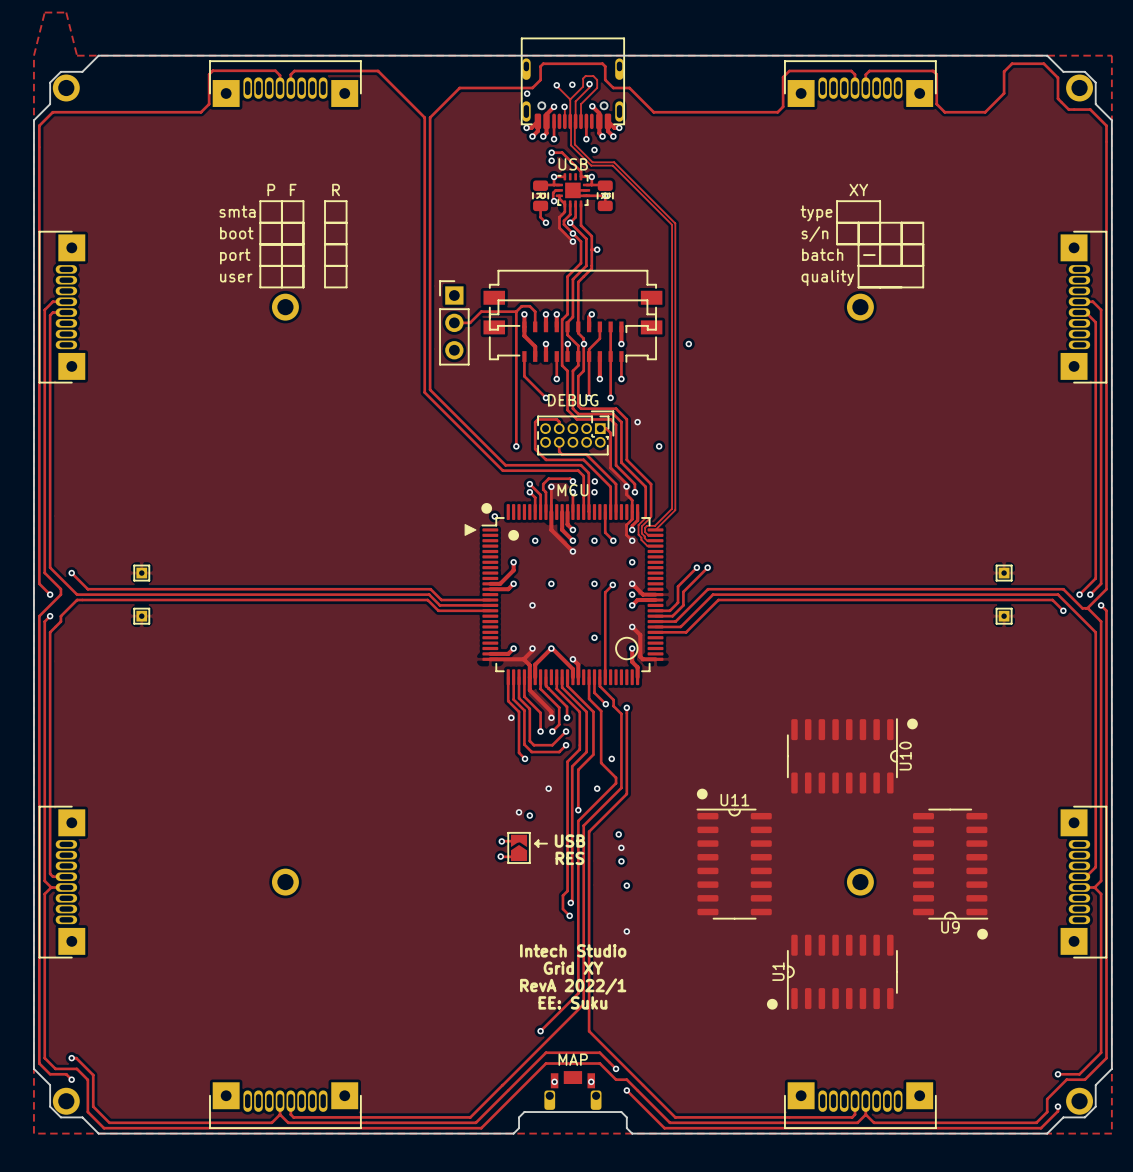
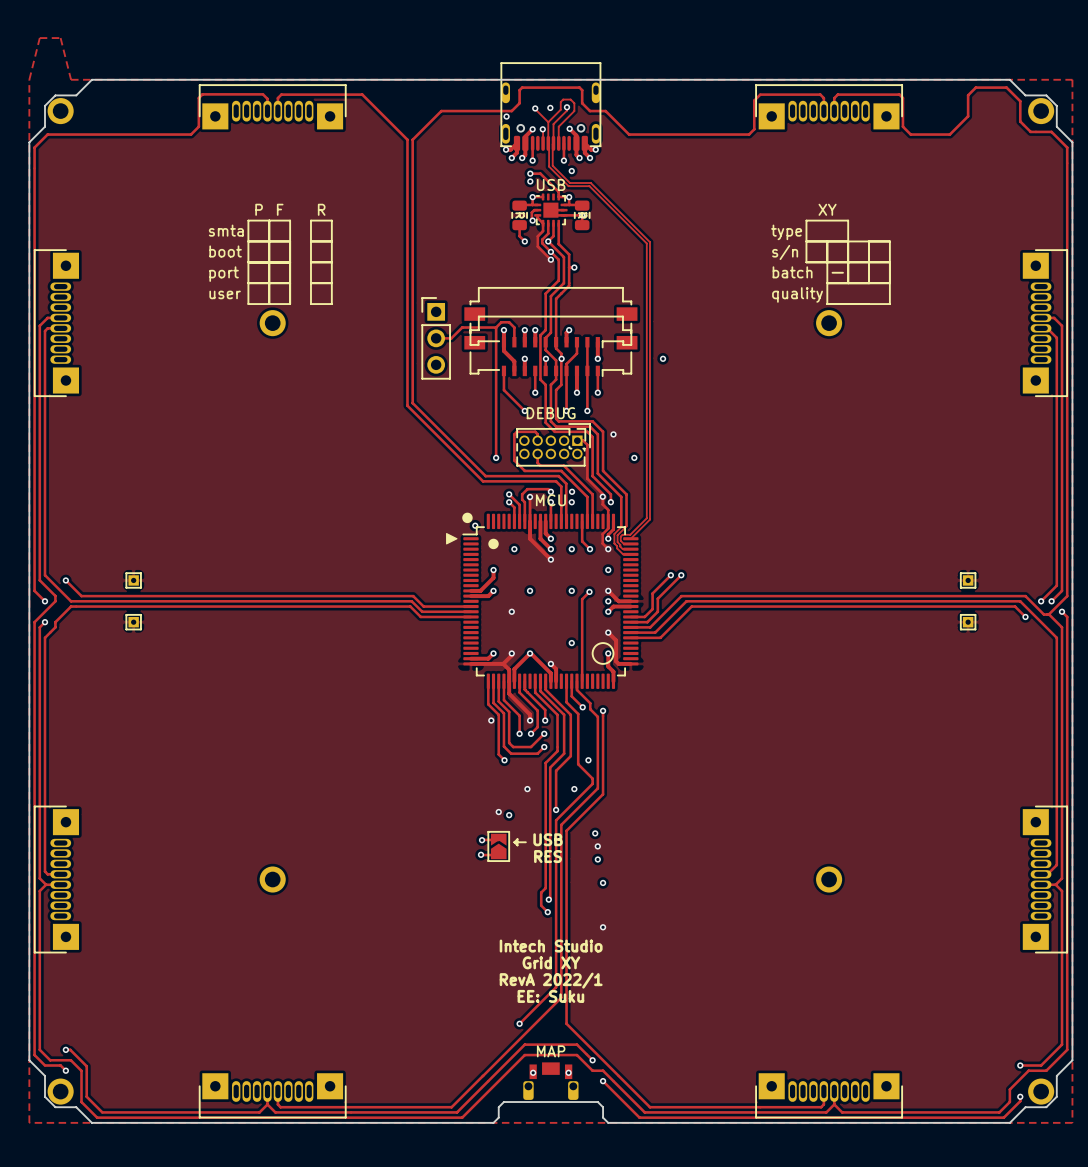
U10: (852, 755) -> none
U11: (734, 853) -> none
U9: (950, 874) -> none
U1: (832, 972) -> none

